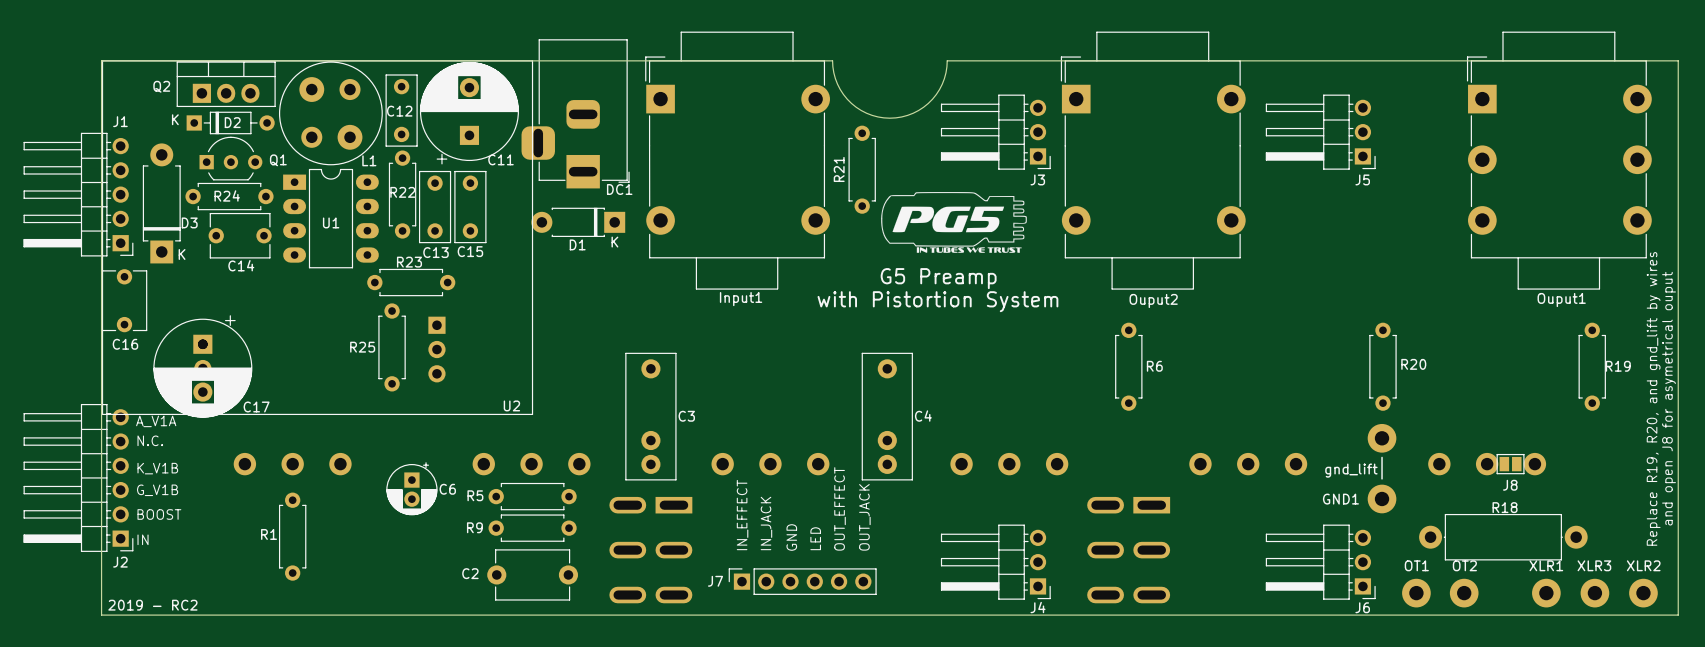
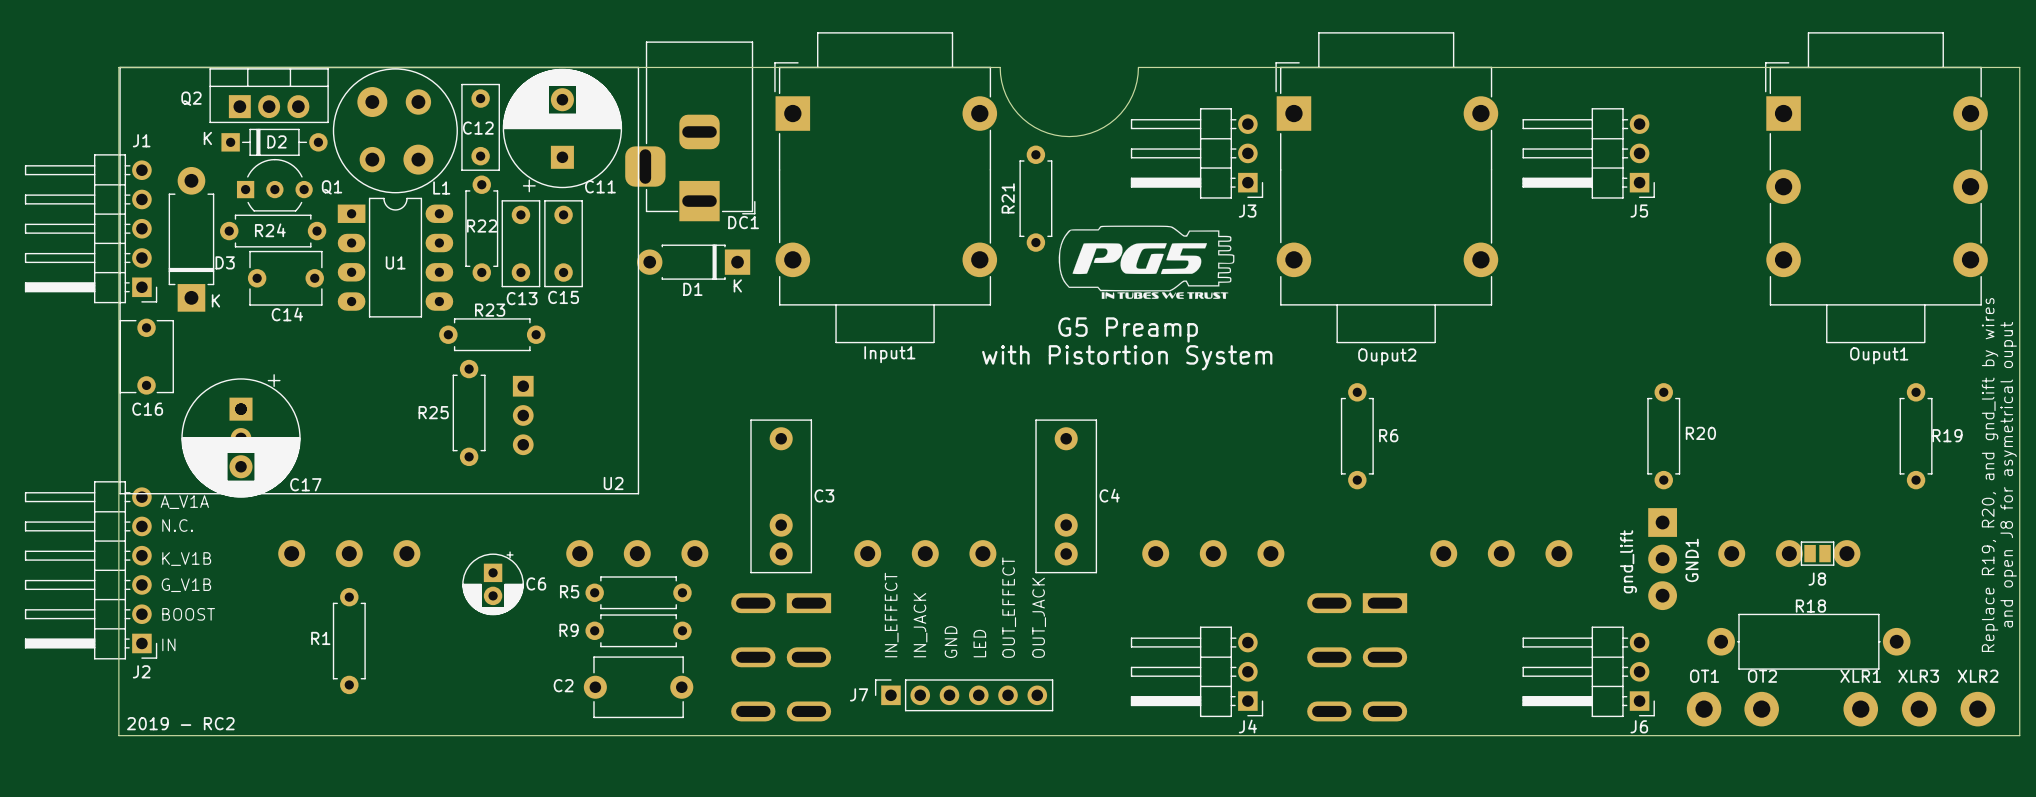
GND1 footprint: [1367, 423, 1397, 514] -> [1648, 508, 1678, 611]
line: (1382, 457) (1382, 478) -> none
text rotation: 0° (1351, 470) -> 90° counterclockwise (1628, 561)
GND1 name position: GND1 (1340, 499) -> GND1 (1692, 560)

